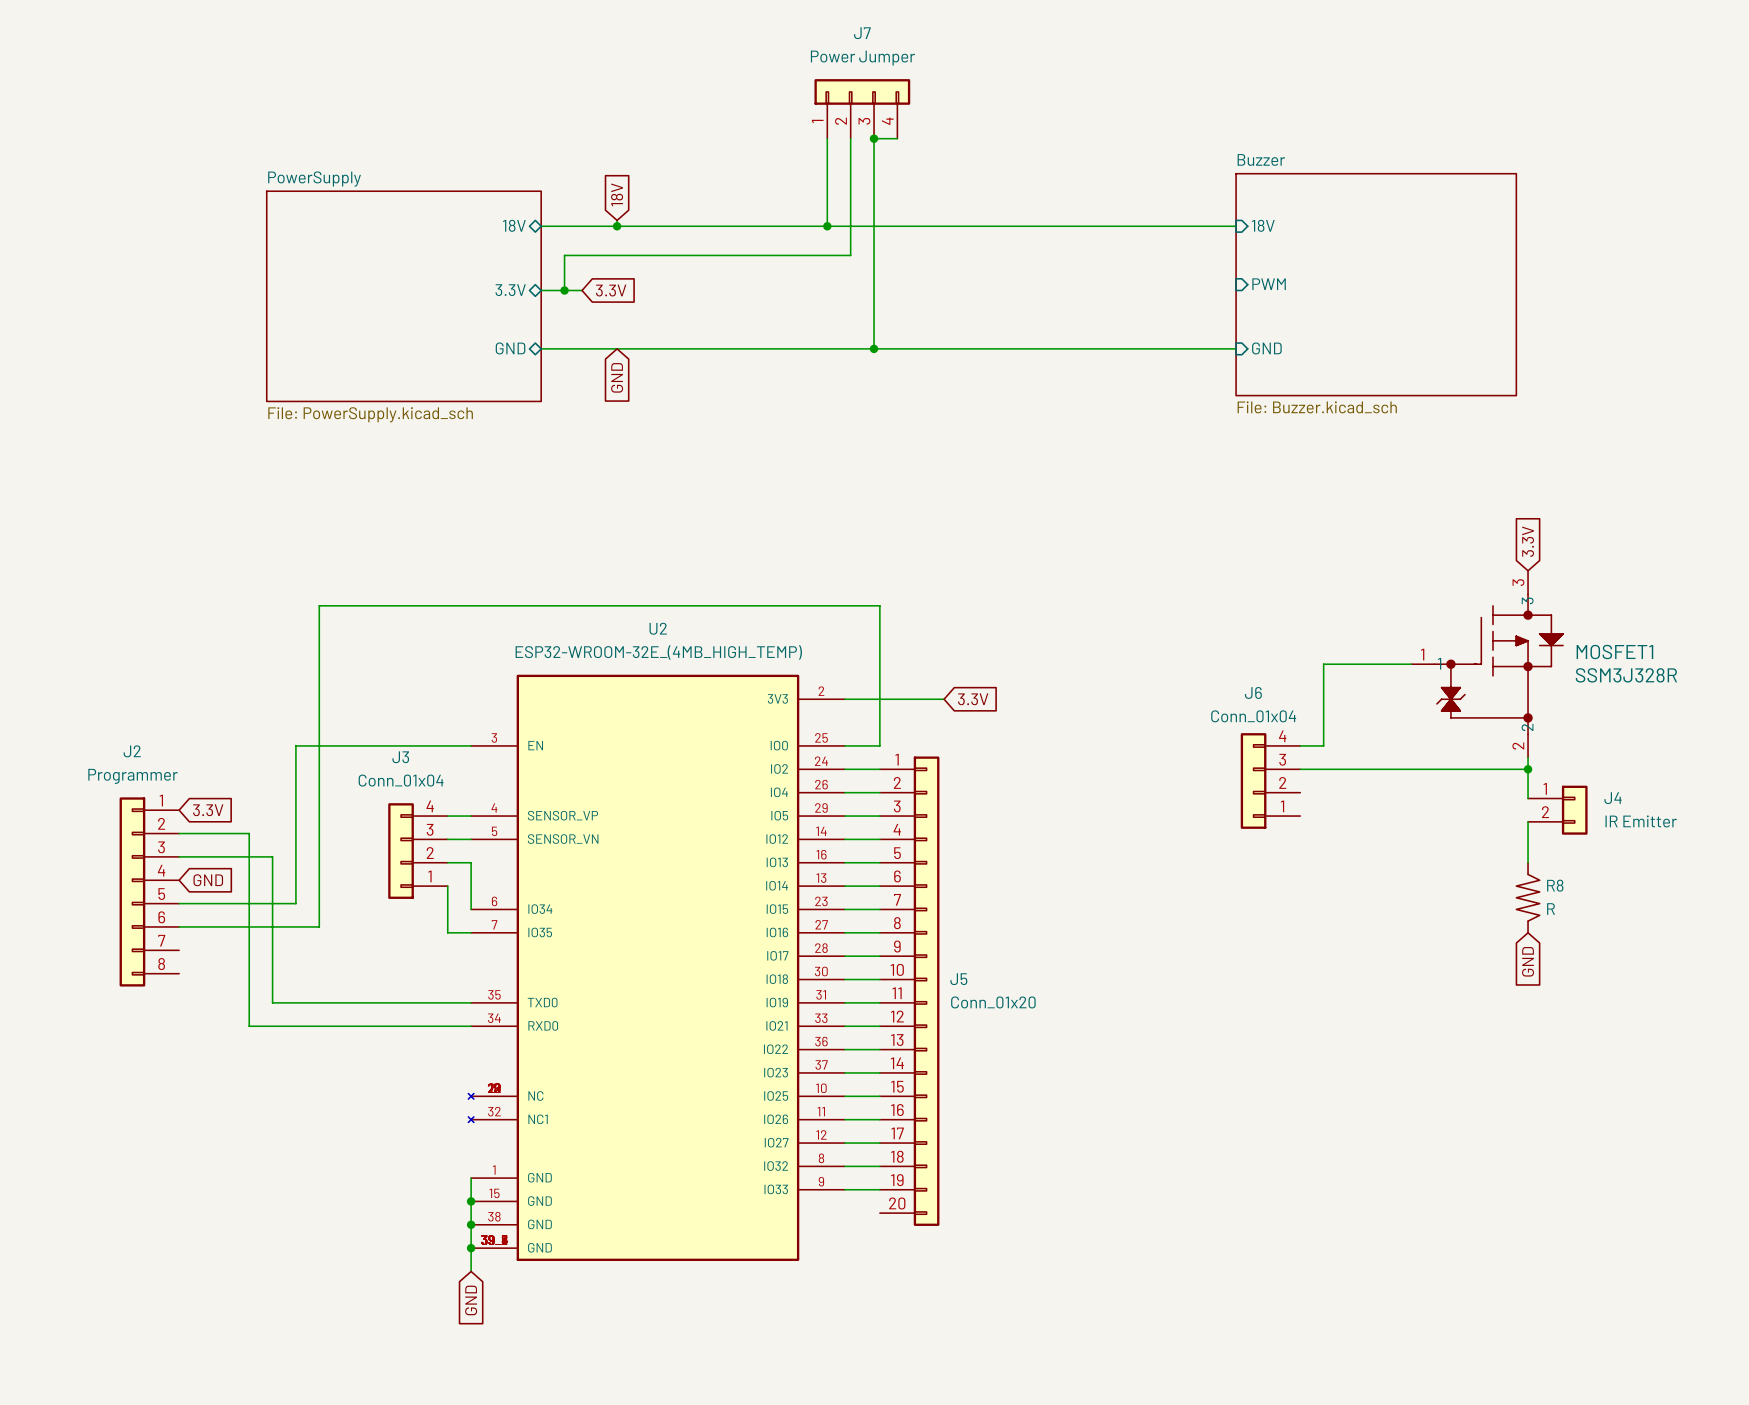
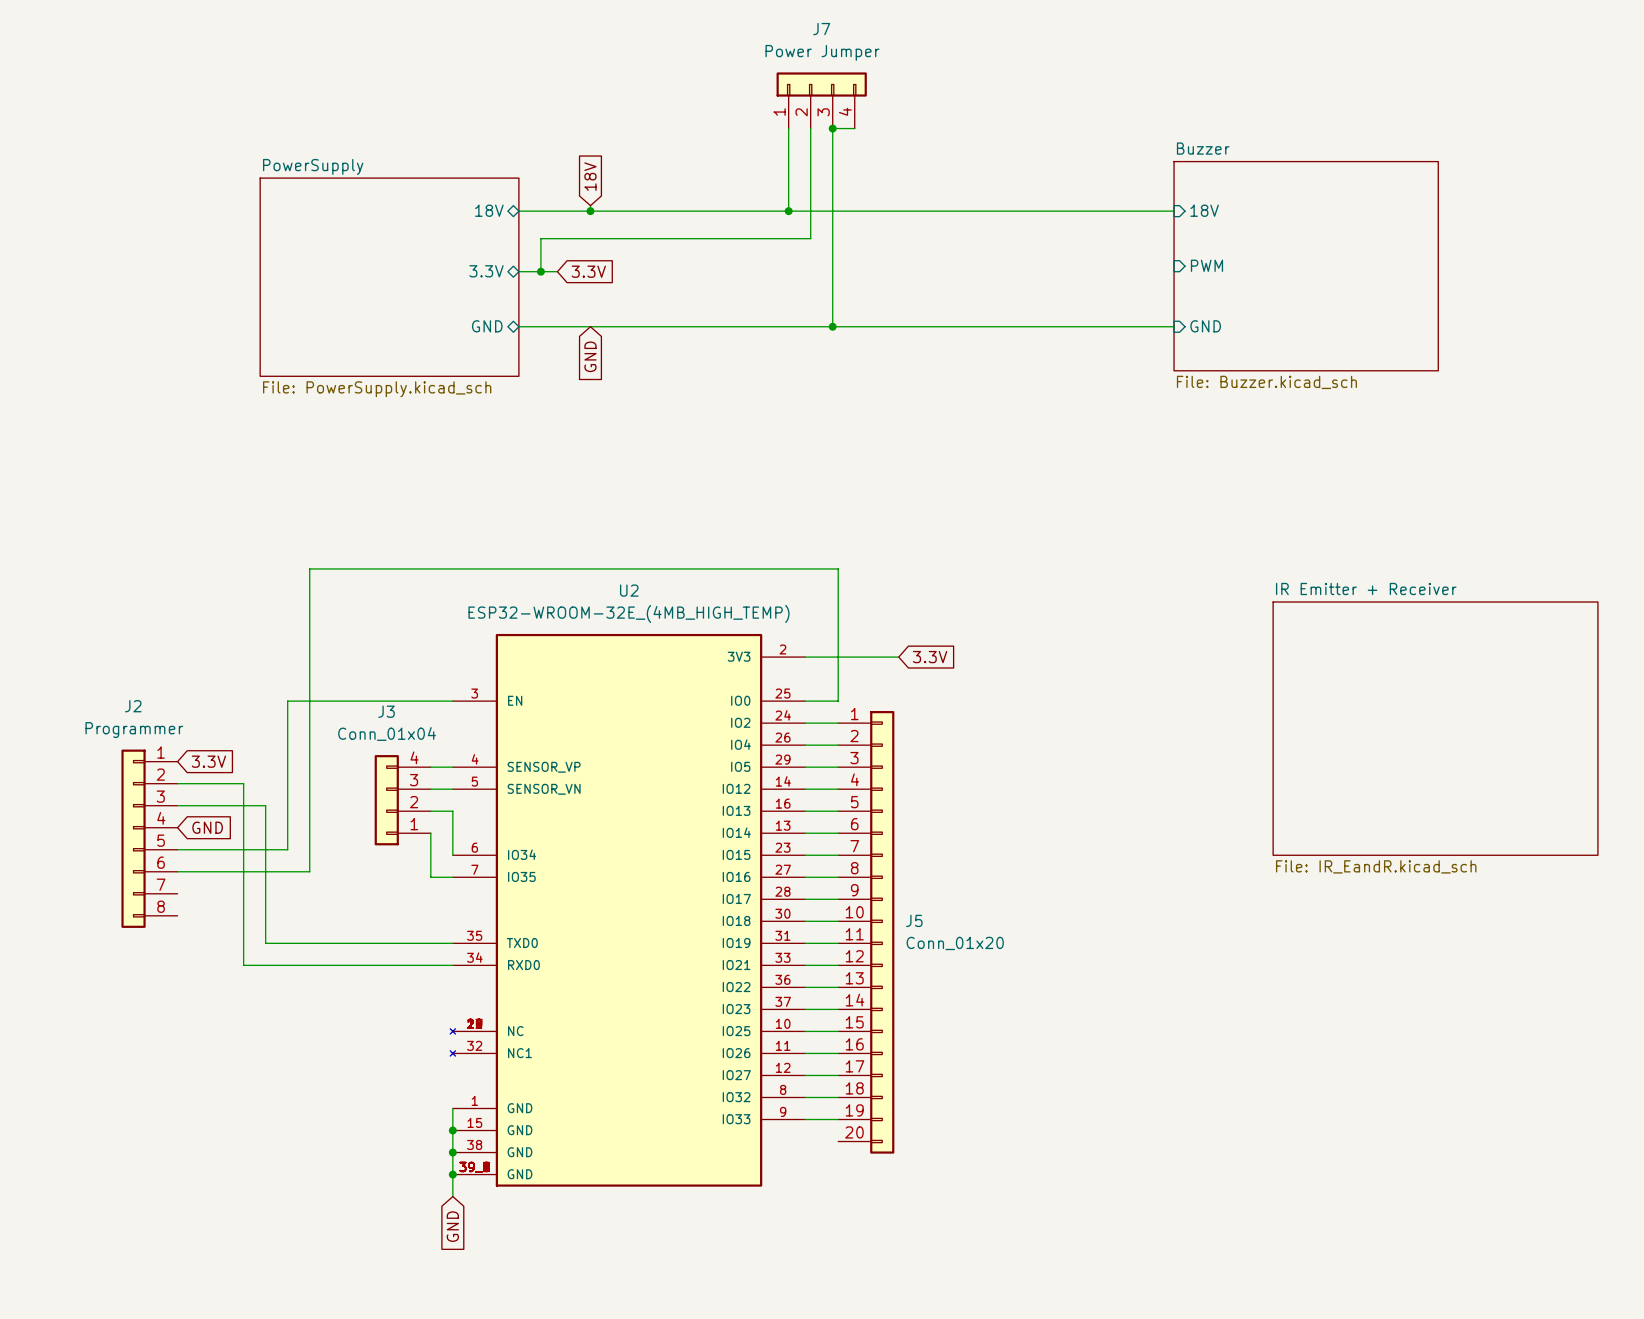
global label: 3.3V (1528, 541) -> none
wire: (1411, 664) (1323, 664) (1323, 745) (1300, 745) -> none
MOSFET1: SSM3J328R (1487, 664) -> none
wire: (1528, 757) (1528, 798) -> none
wire: (1300, 769) (1528, 769) -> none
junction: (1528, 769) -> none
sheet IR Emitter + Receiver: none -> File: IR_EandR.kicad_sch (1435, 728)
J6: Conn_01x04 (1270, 780) -> none
J4: IR Emitter (1557, 810) -> none
wire: (1528, 821) (1528, 862) -> none
R8: R (1528, 897) -> none
global label: GND (1528, 961) -> none

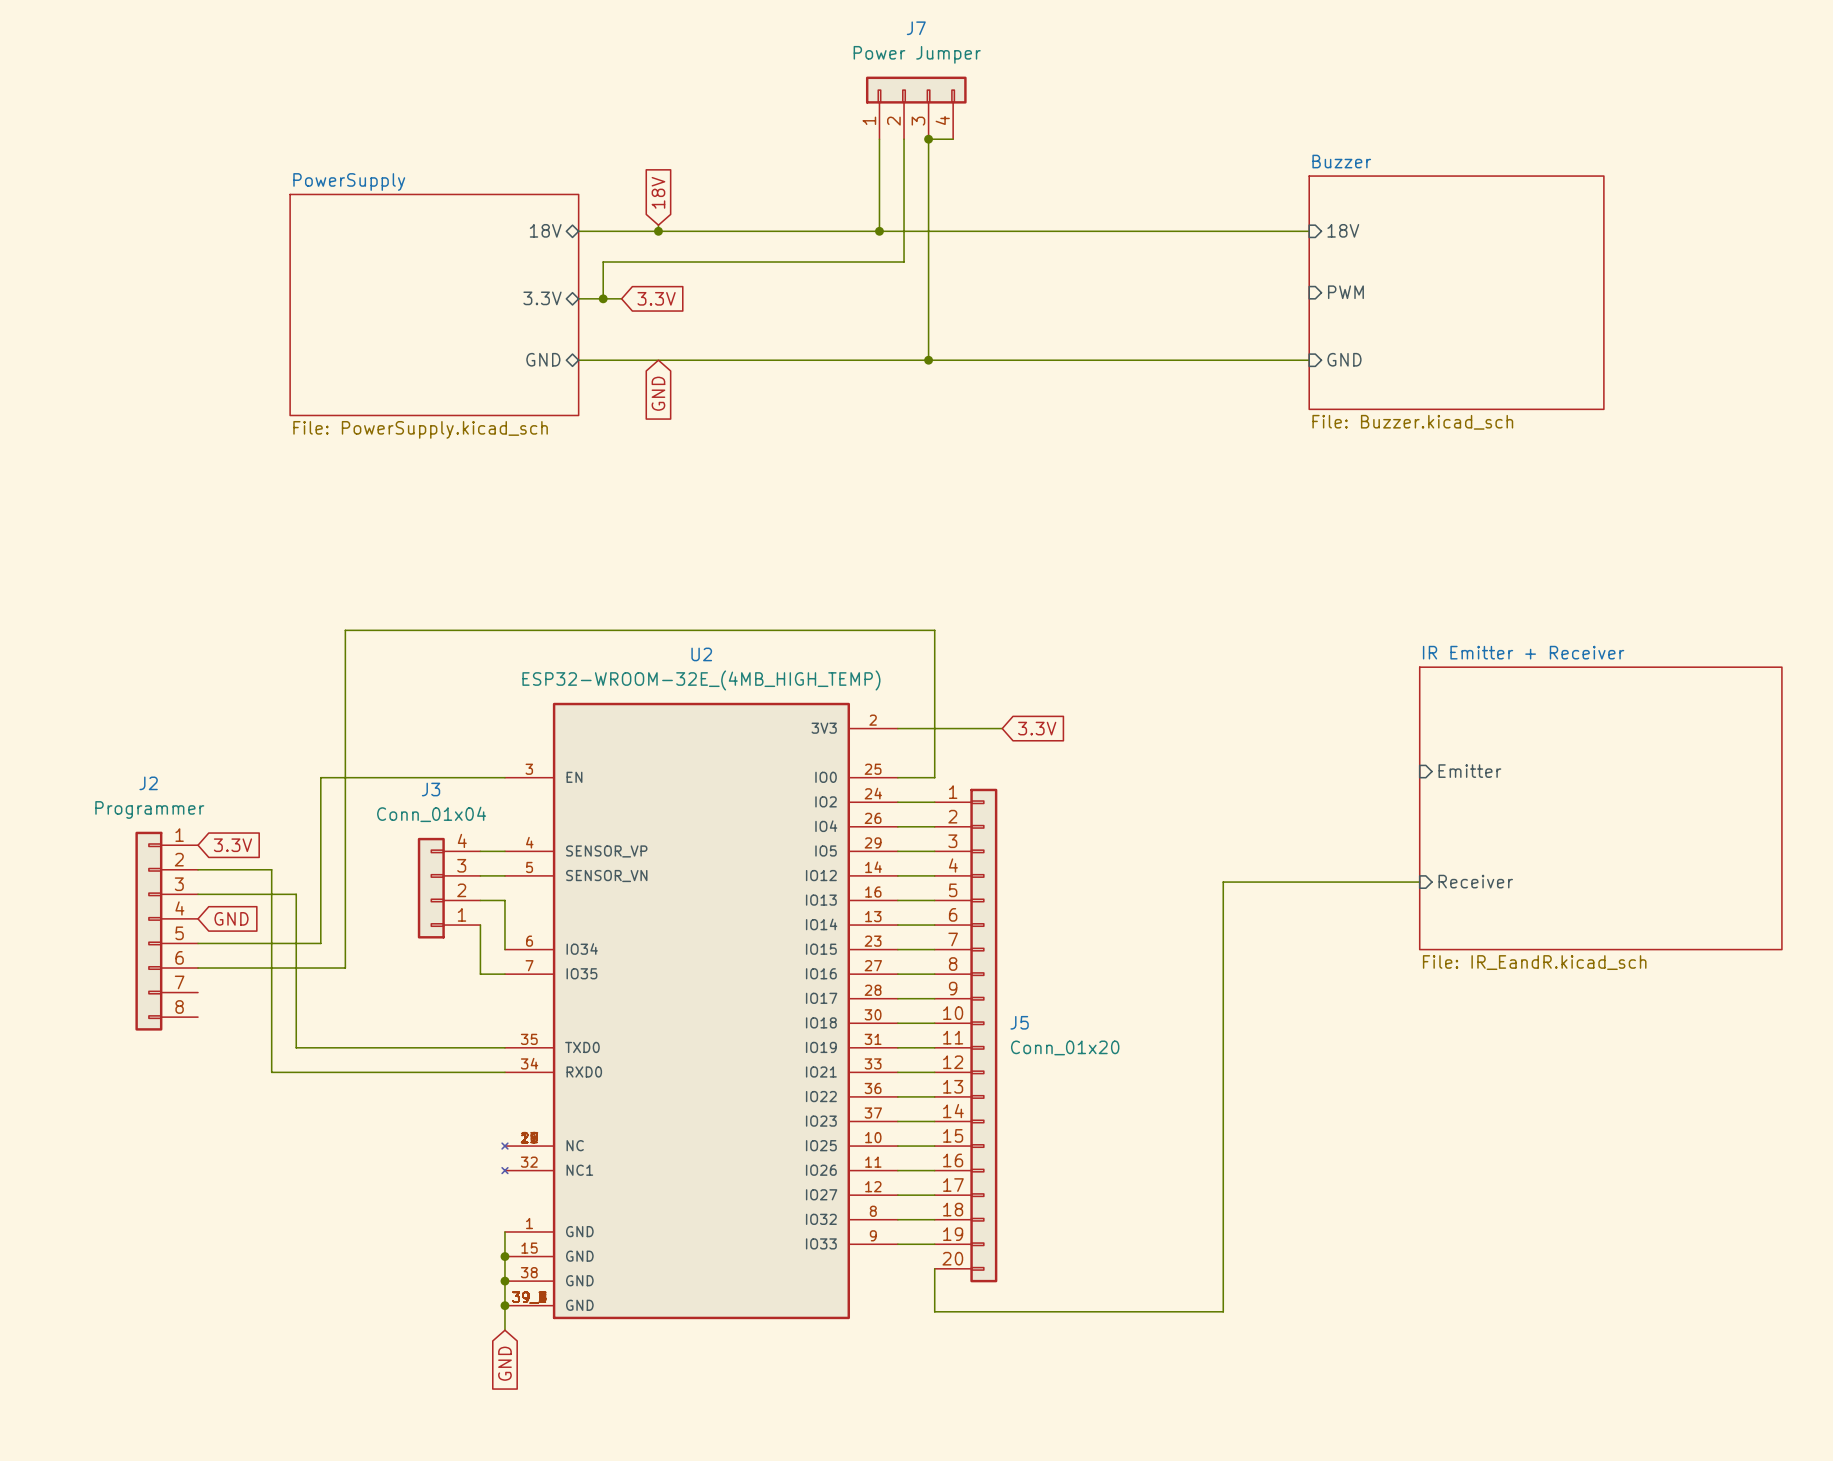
sheet pin: none -> Emitter (1469, 771)
wire: none -> (1419, 882) (1223, 882) (1223, 1311) (934, 1311) (934, 1268)
sheet pin: none -> Receiver (1475, 881)

